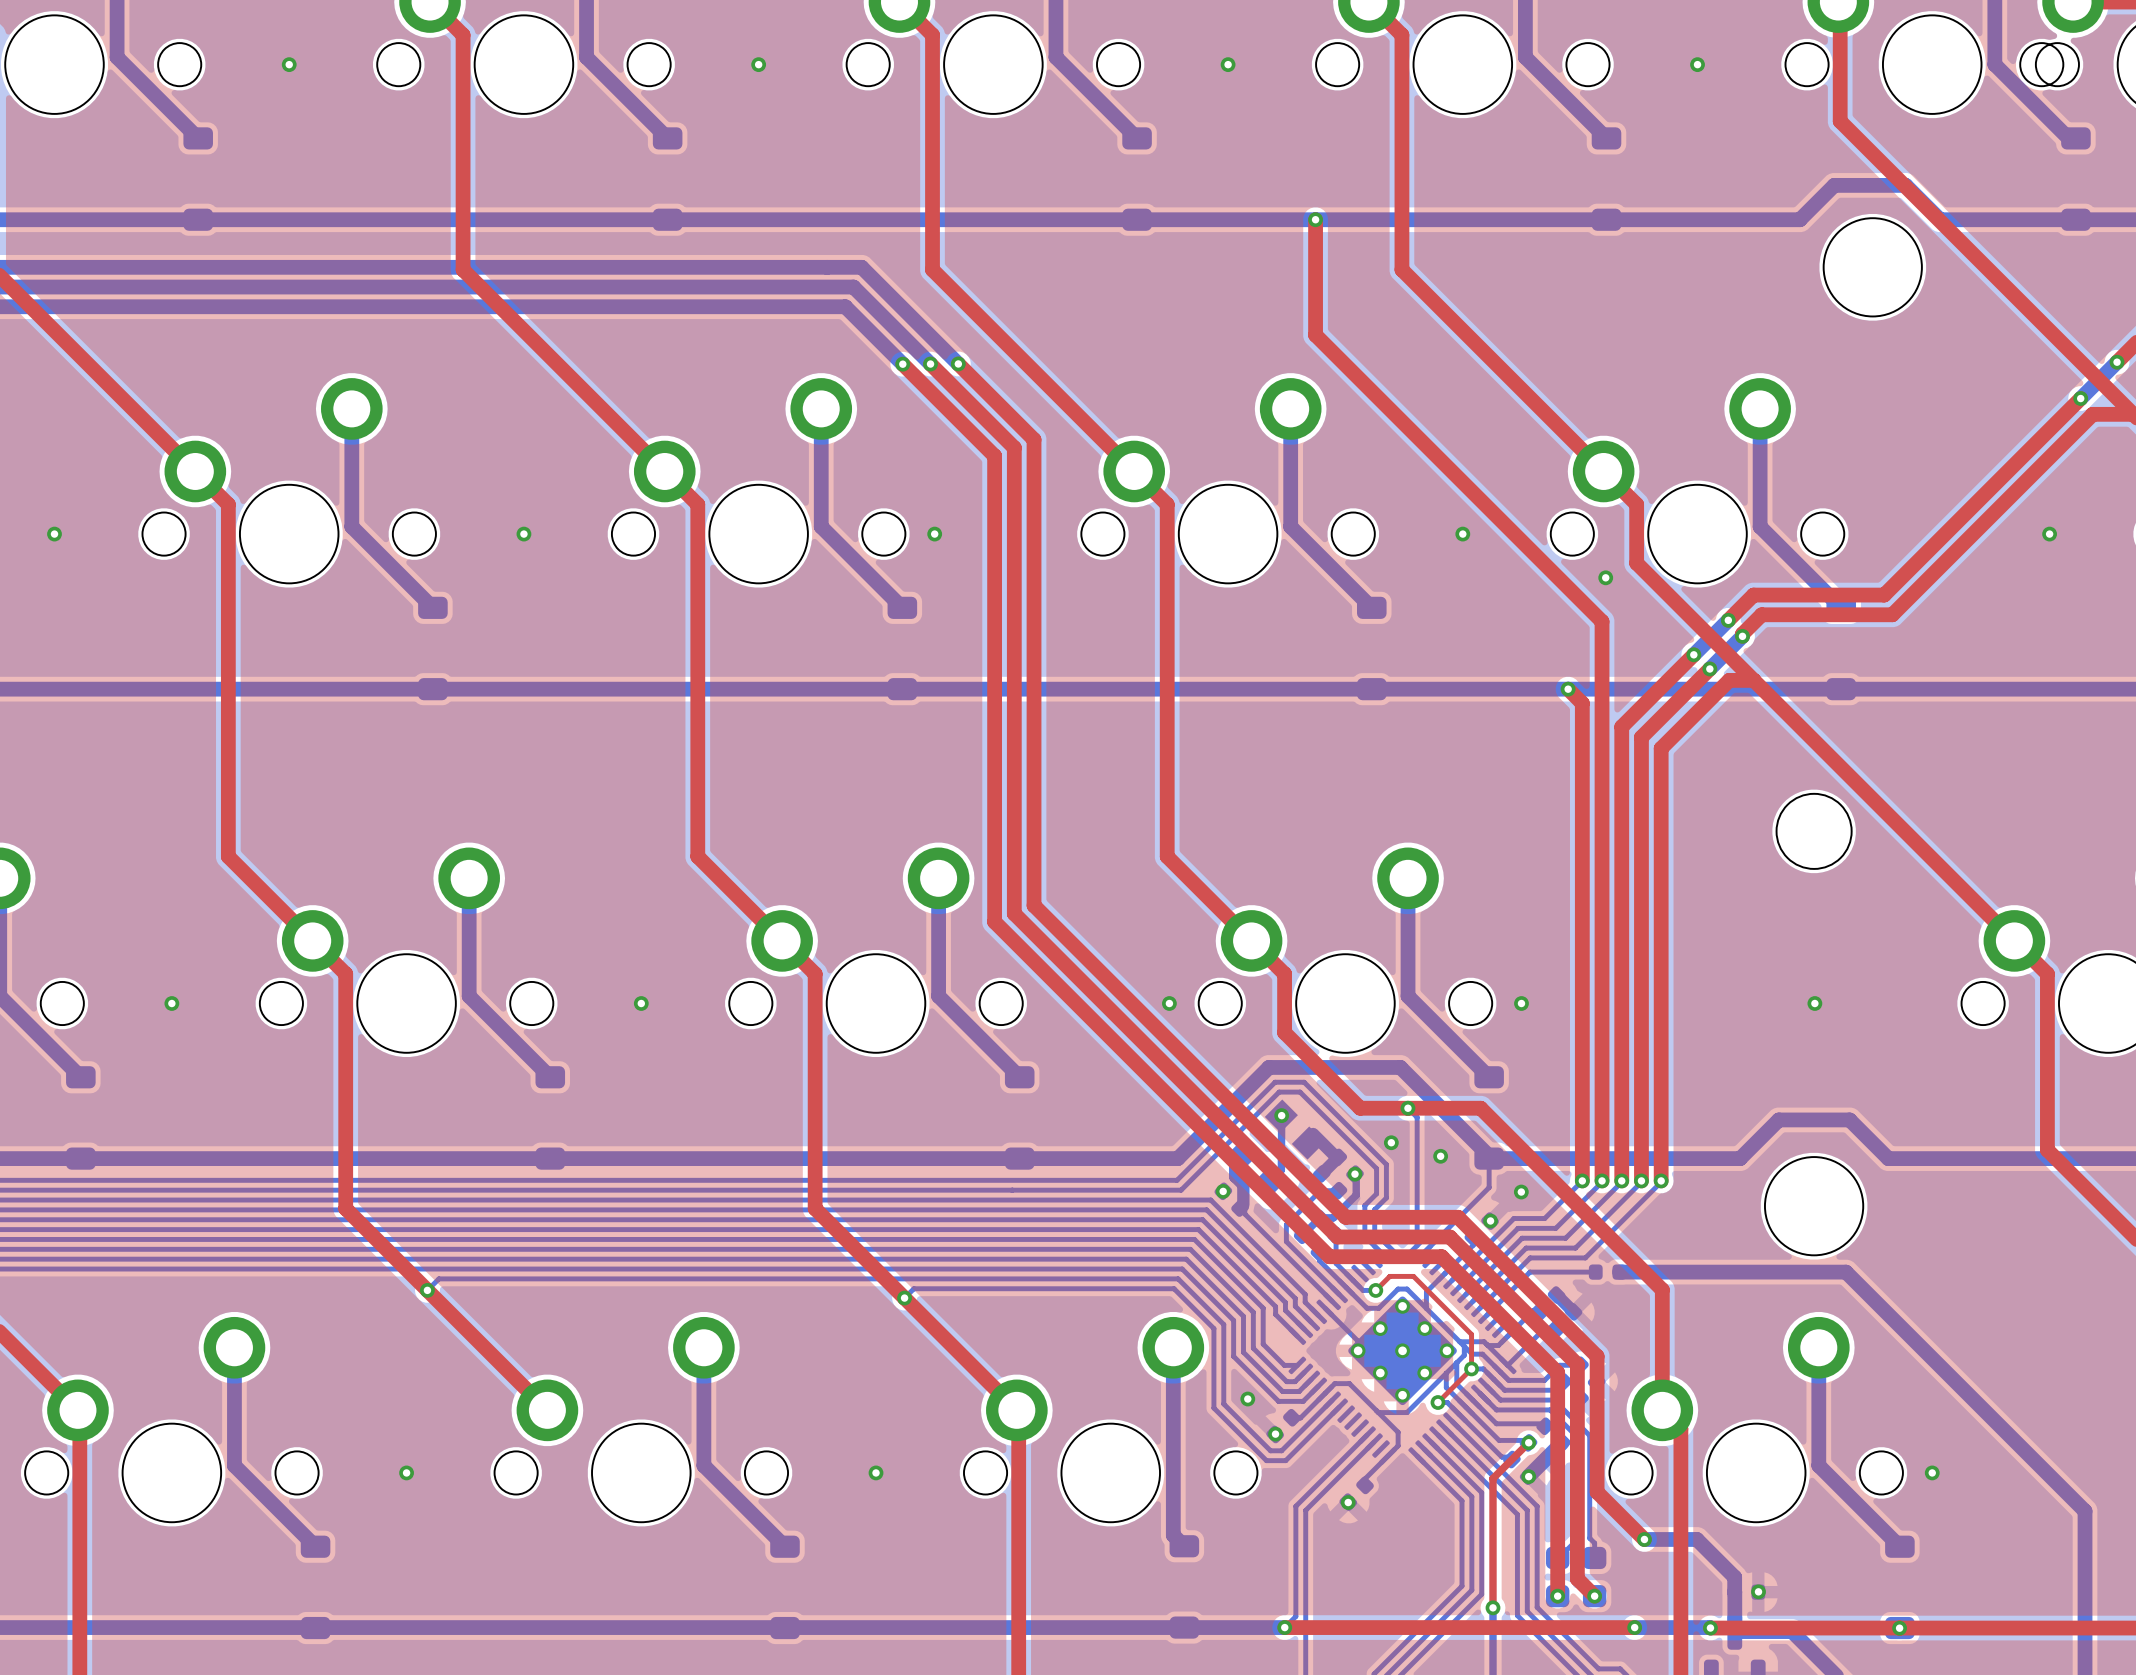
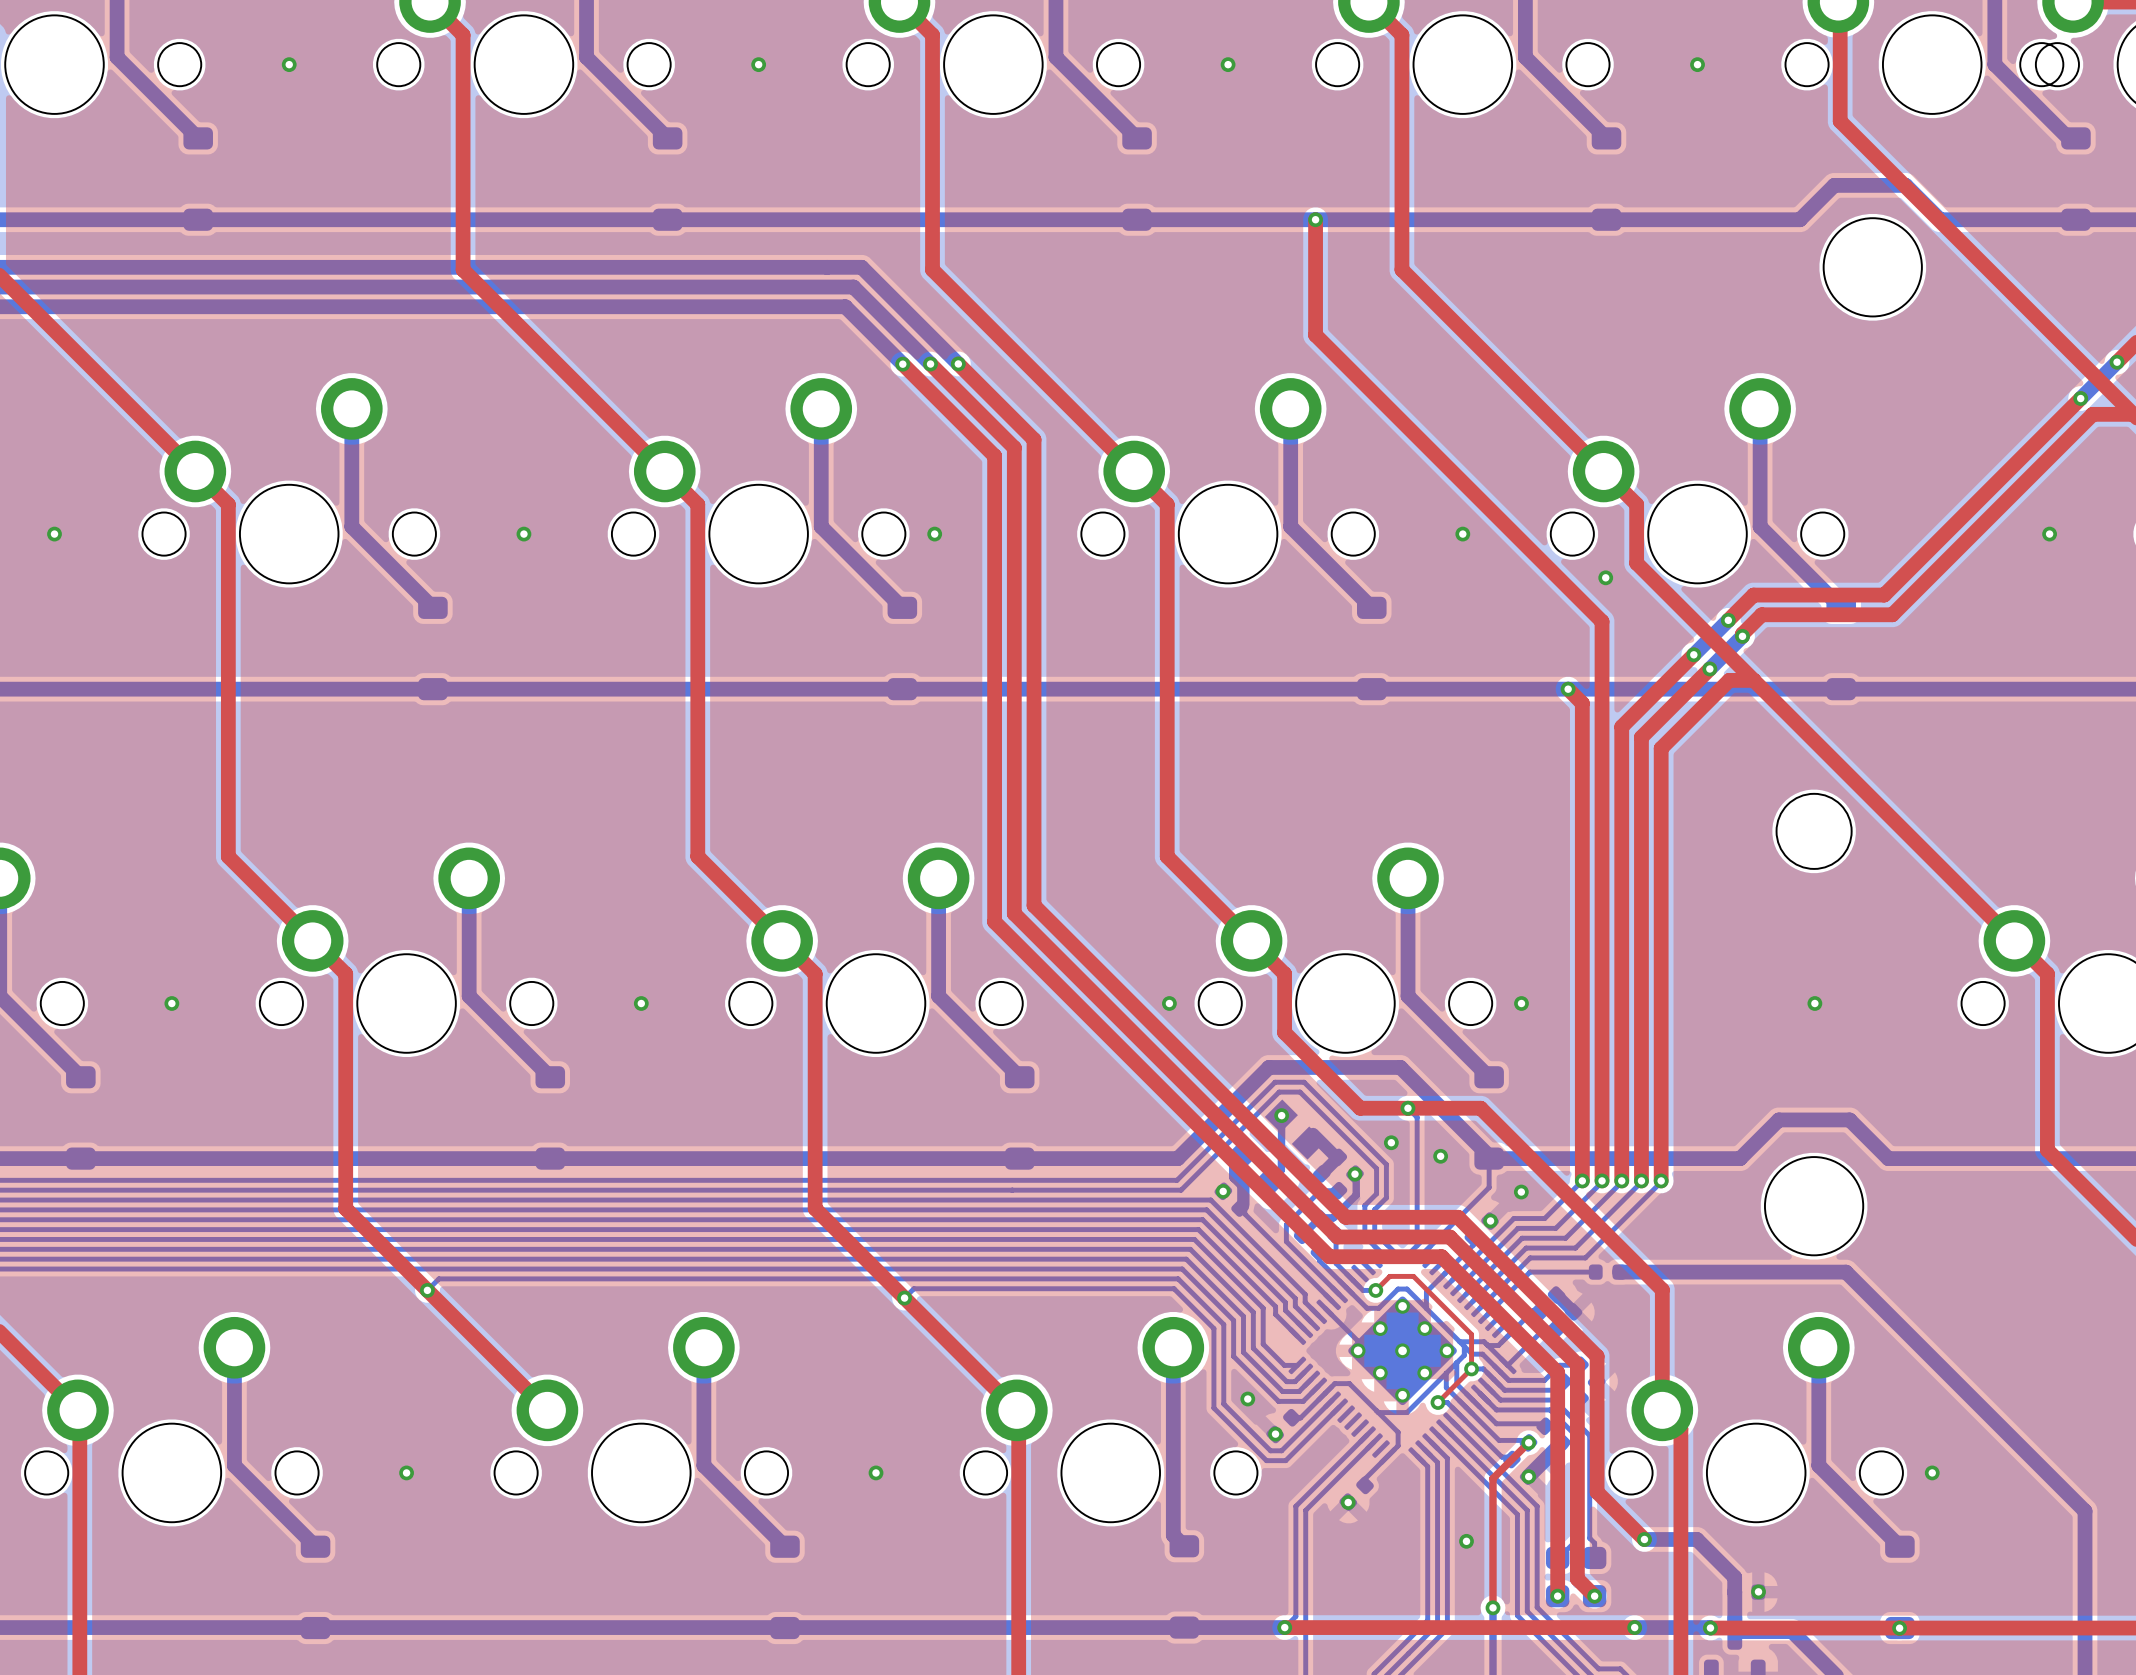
bottom track: (1447, 1458) (1481, 1492) (1481, 1594) (1447, 1628) -> (1447, 1458) (1447, 1628)
bottom track: (1437, 1462) (1471, 1496) (1471, 1590) (1437, 1624) -> (1437, 1462) (1437, 1624)
bottom track: (1427, 1466) (1462, 1500) (1462, 1586) (1427, 1620) -> (1427, 1466) (1427, 1620)
via: none -> (1466, 1541)

